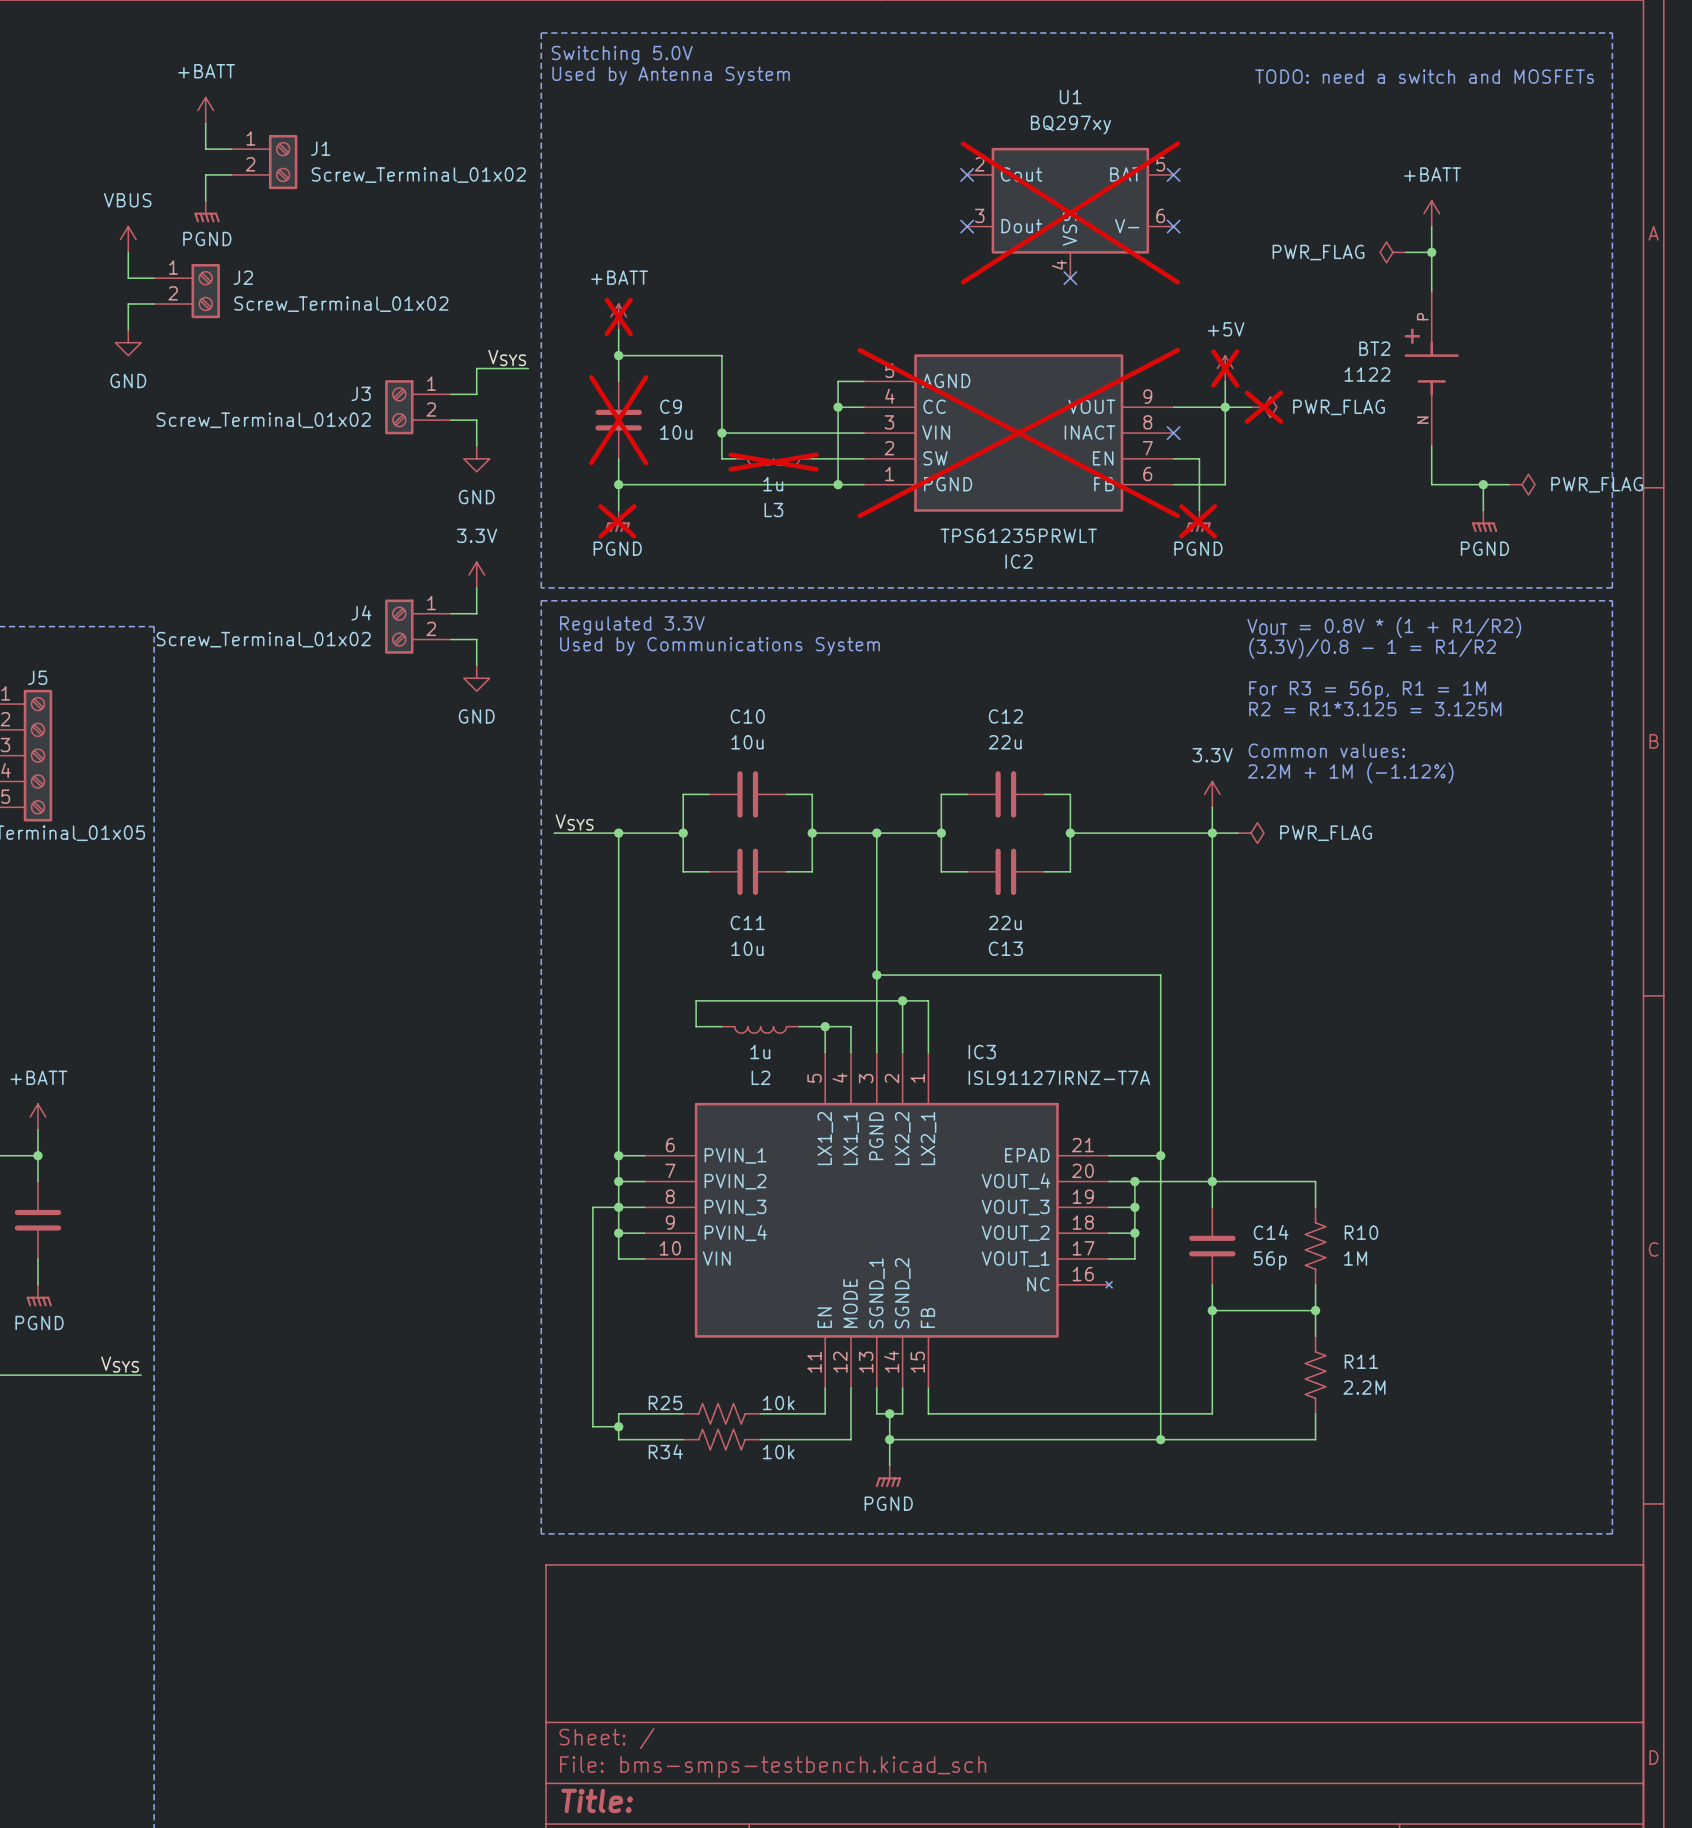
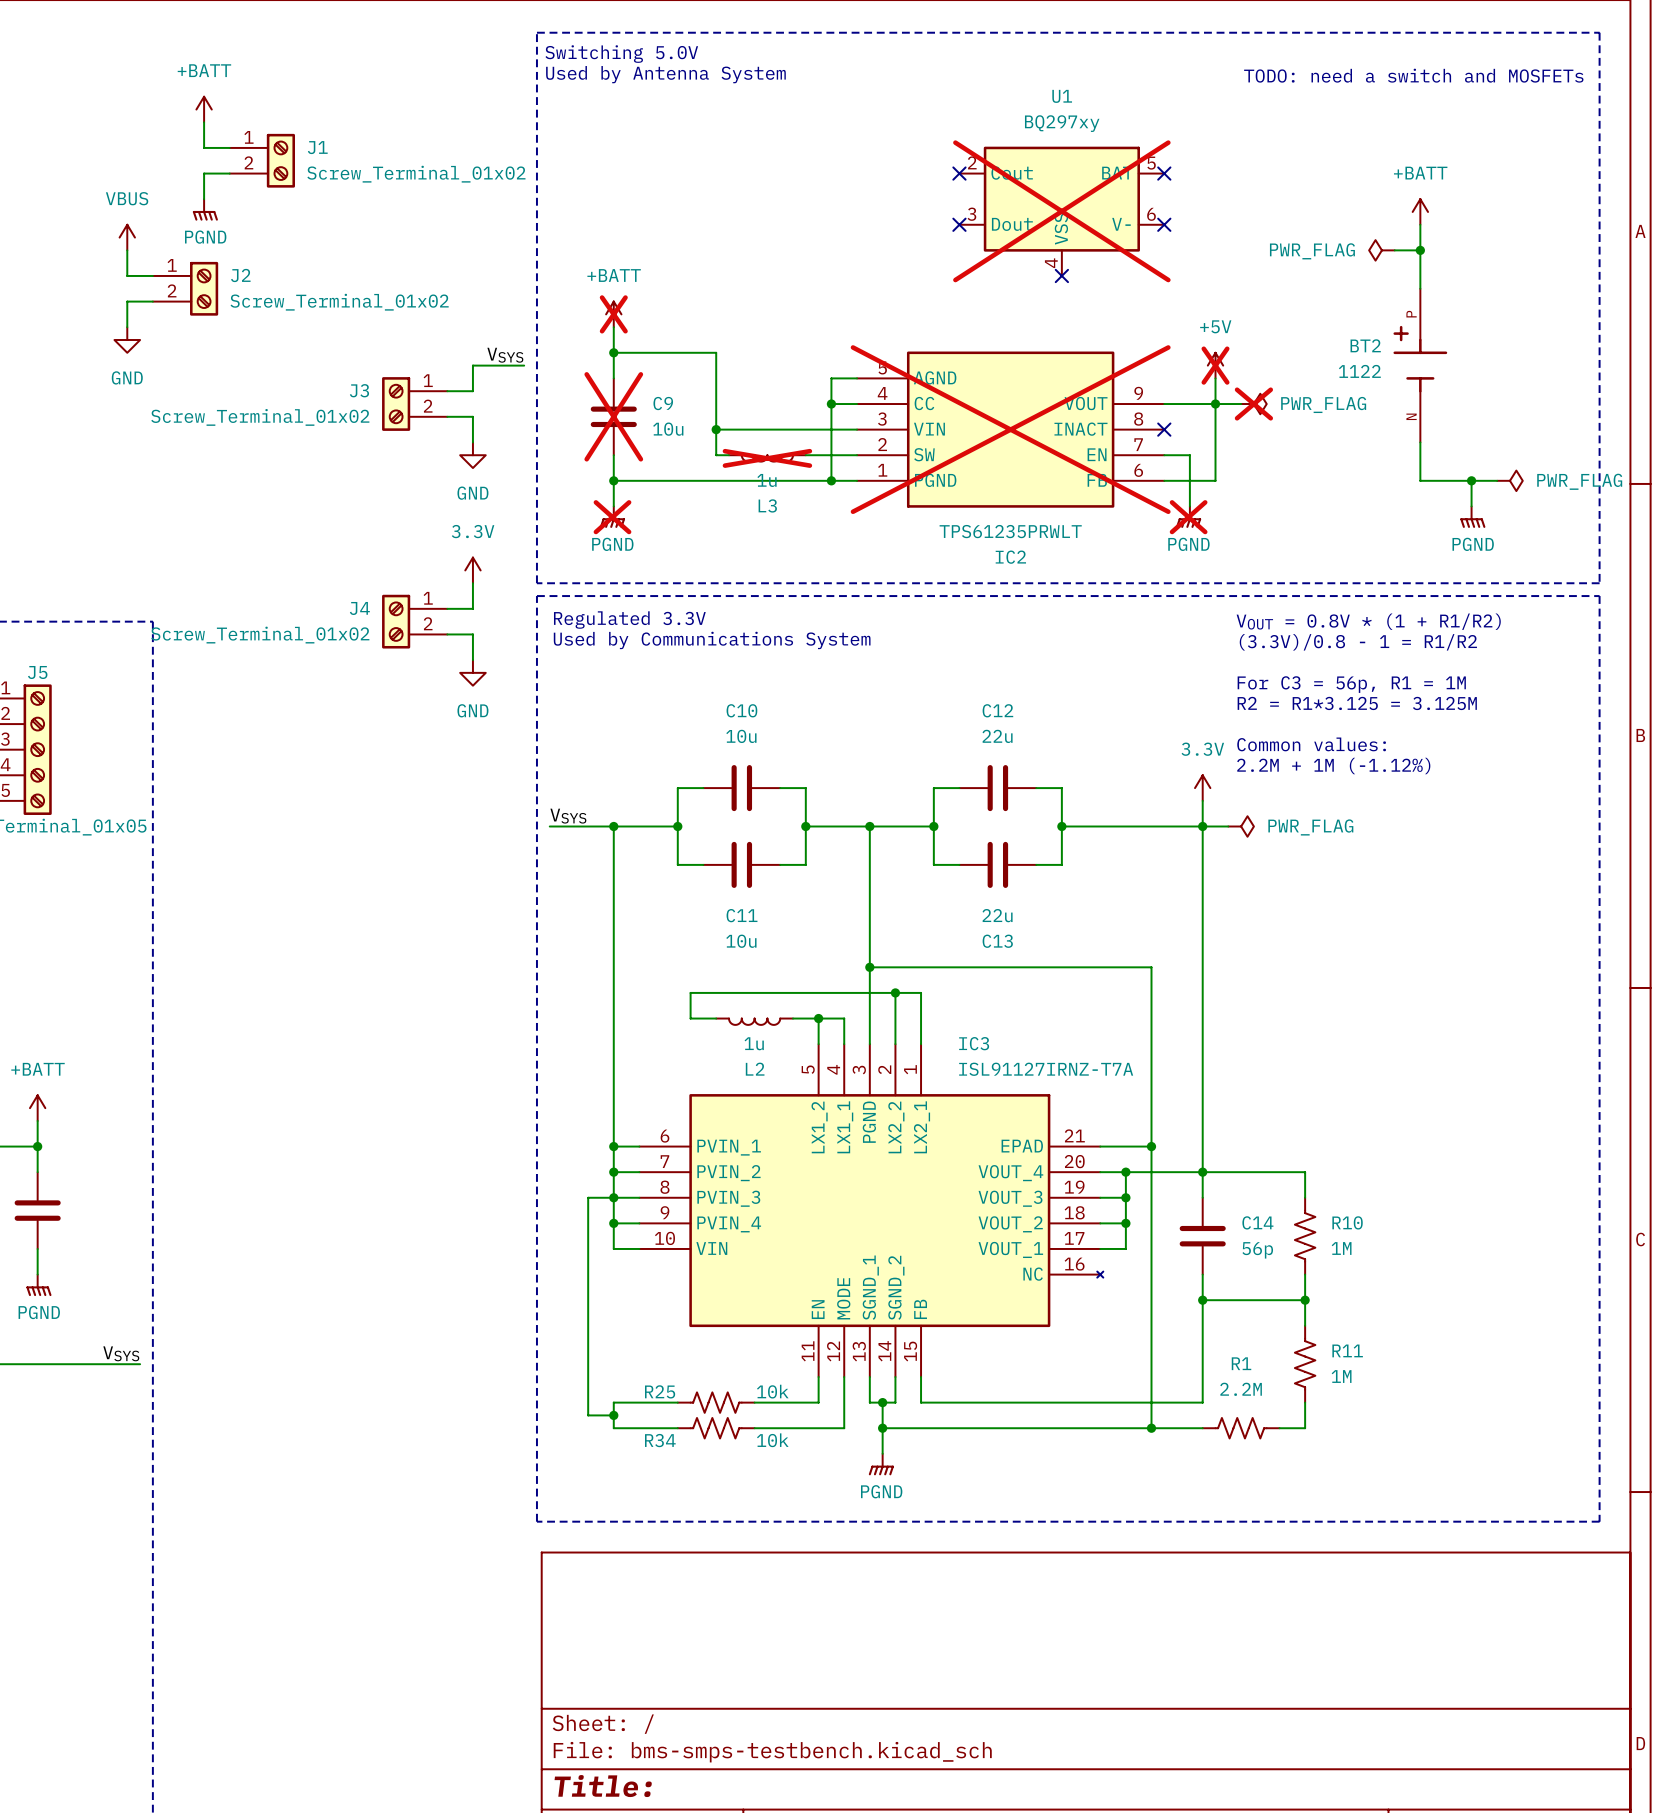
text: For R3 = 56p, R1 = 1M (1367, 690) -> For C3 = 56p, R1 = 1M (1351, 684)
R11 value: 2.2M (1364, 1387) -> 1M (1341, 1376)
R1: none -> 2.2M (1241, 1428)

